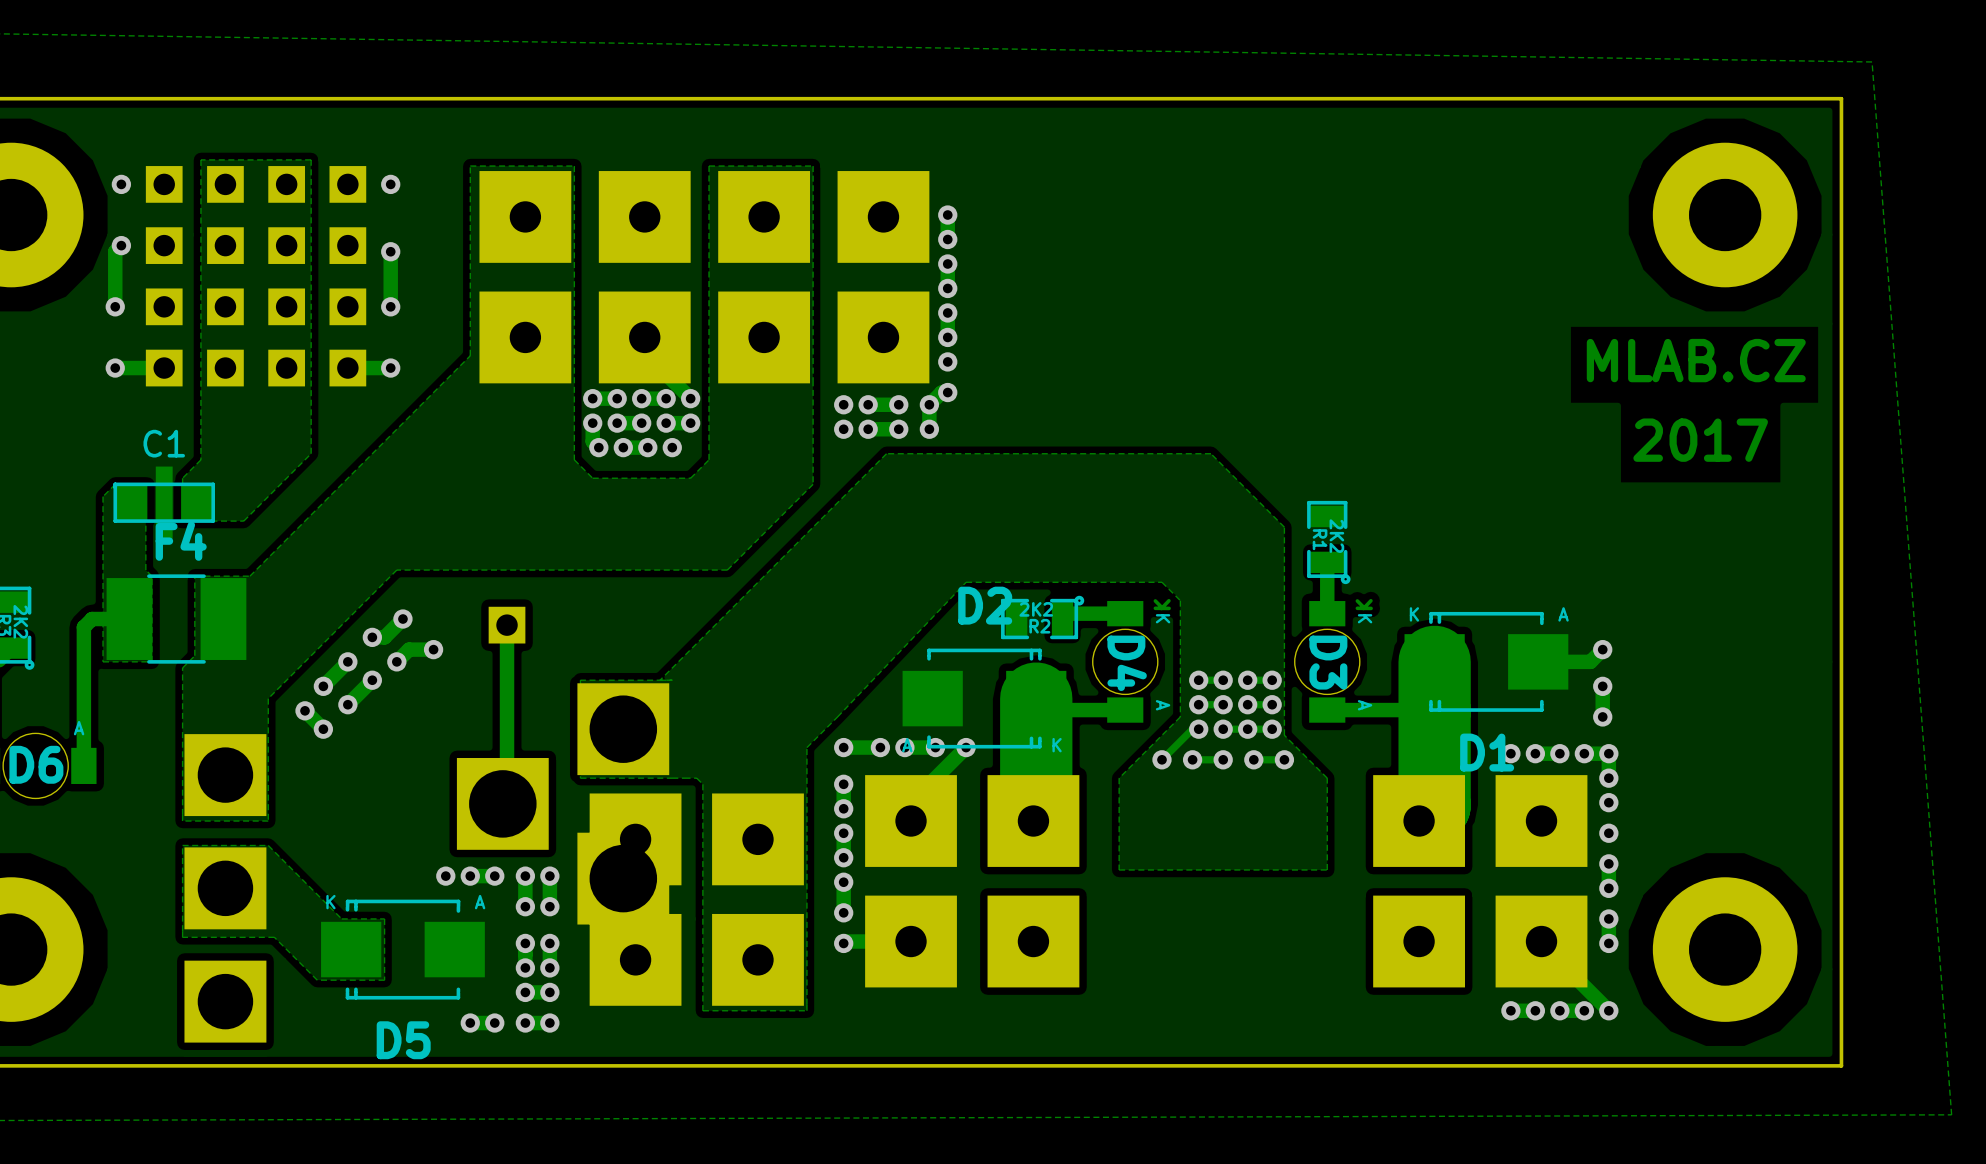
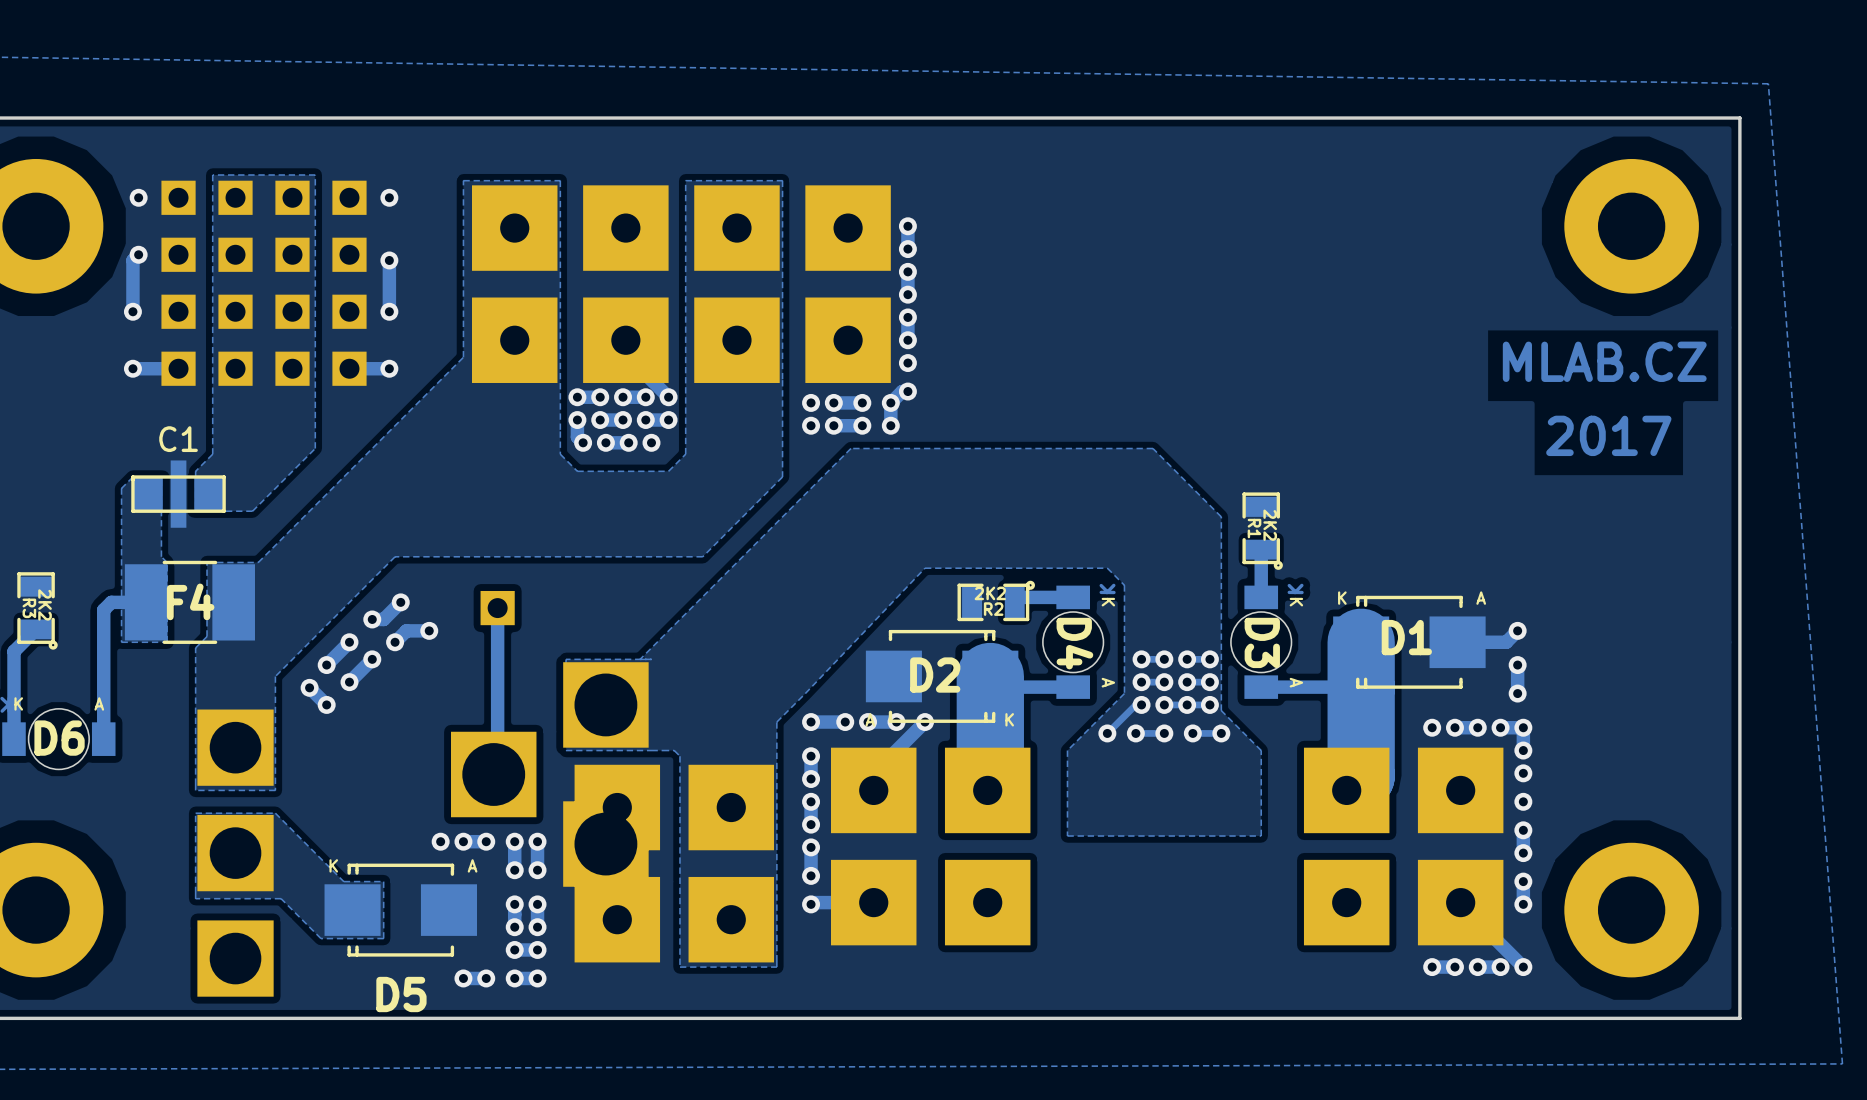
F4 name position: F4 (181, 541) -> F4 (190, 601)
D2 name position: D2 (985, 605) -> D2 (935, 675)
D1 name position: D1 (1487, 752) -> D1 (1406, 637)

